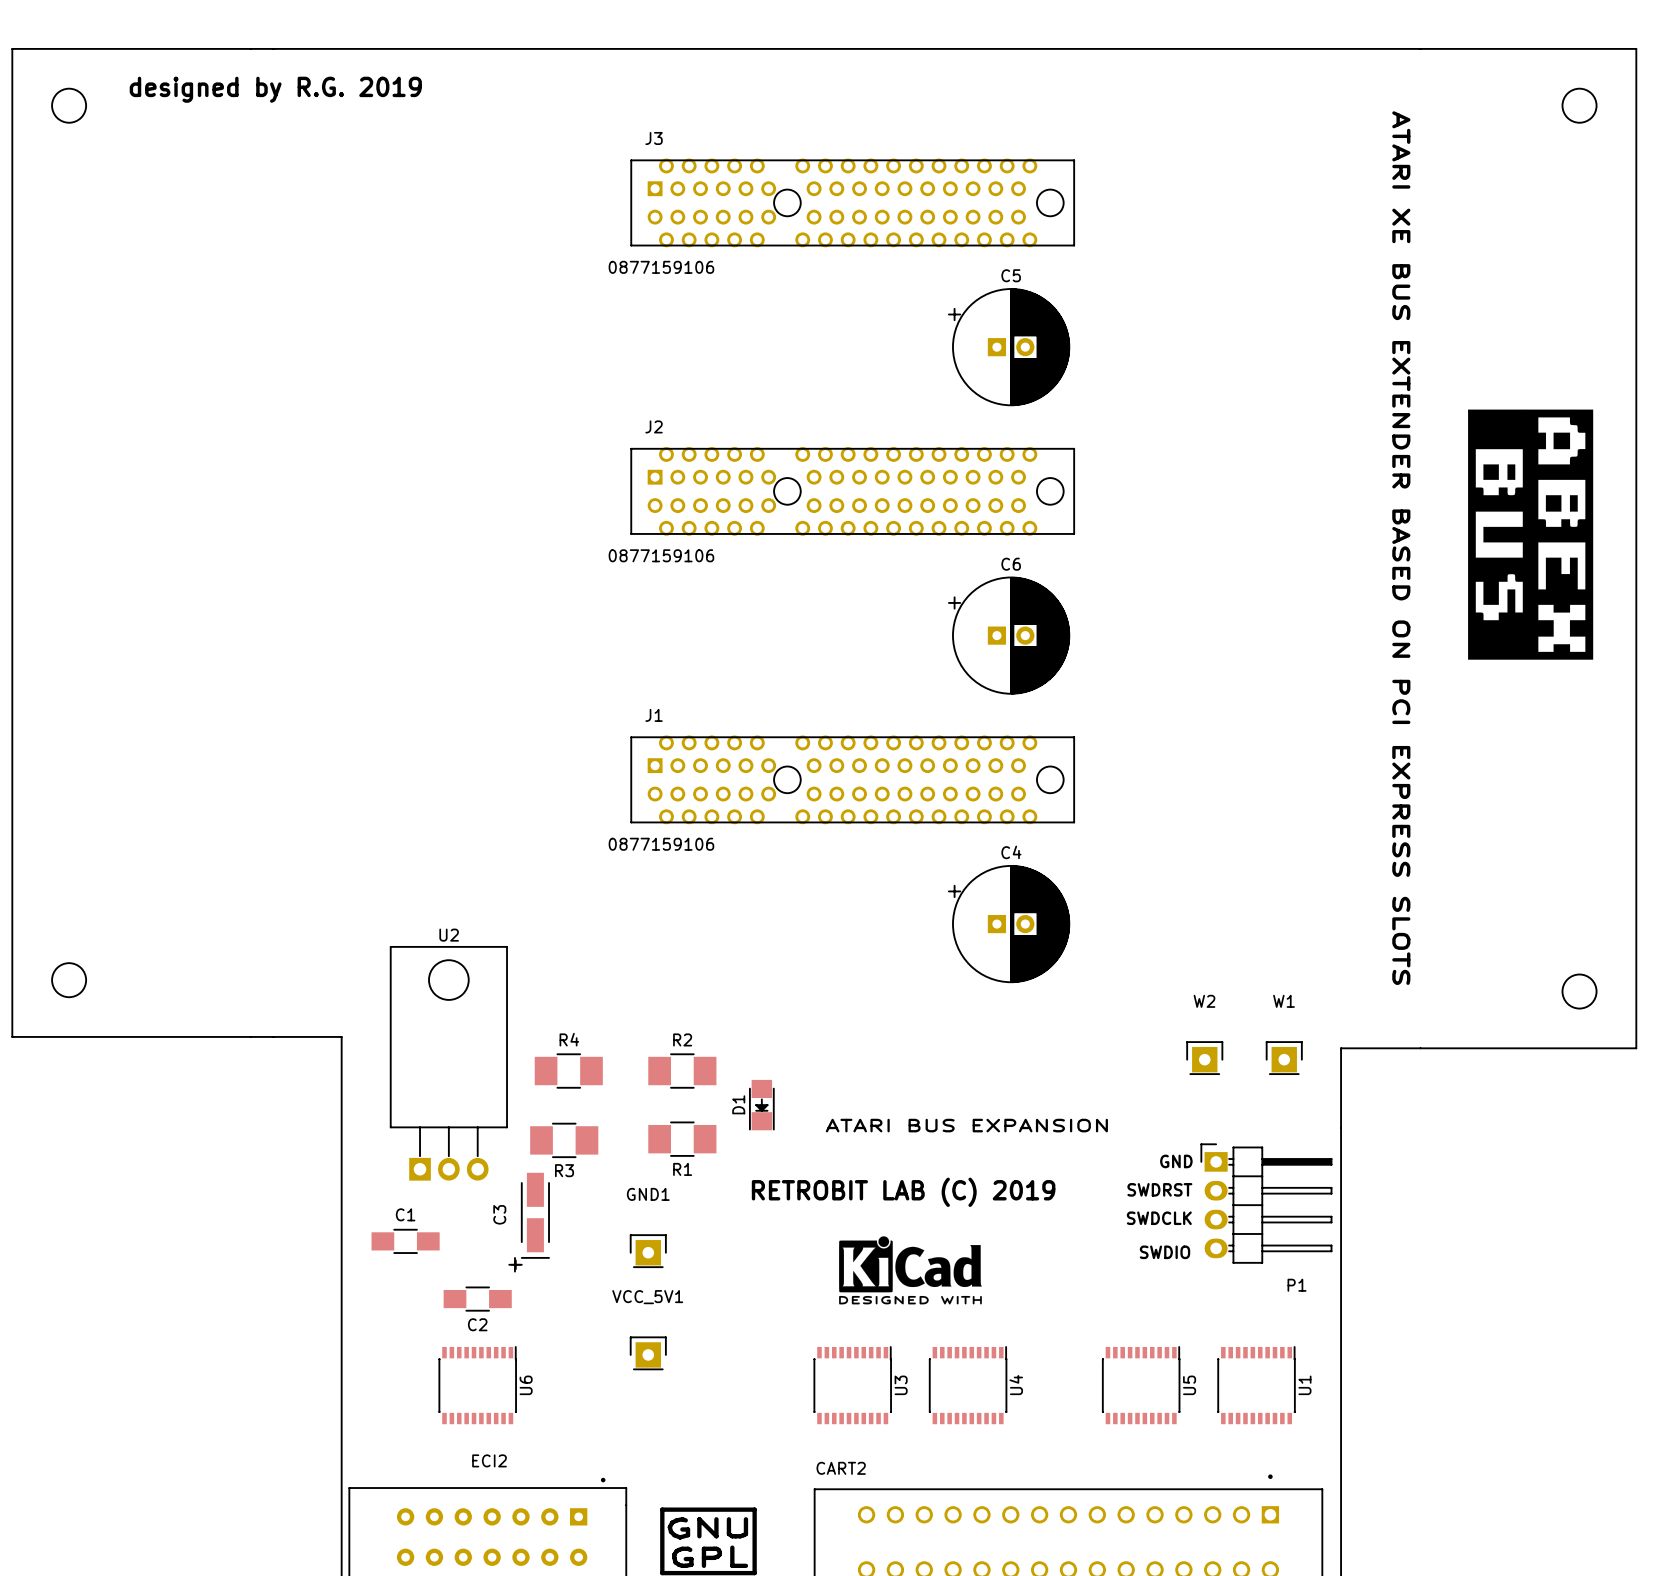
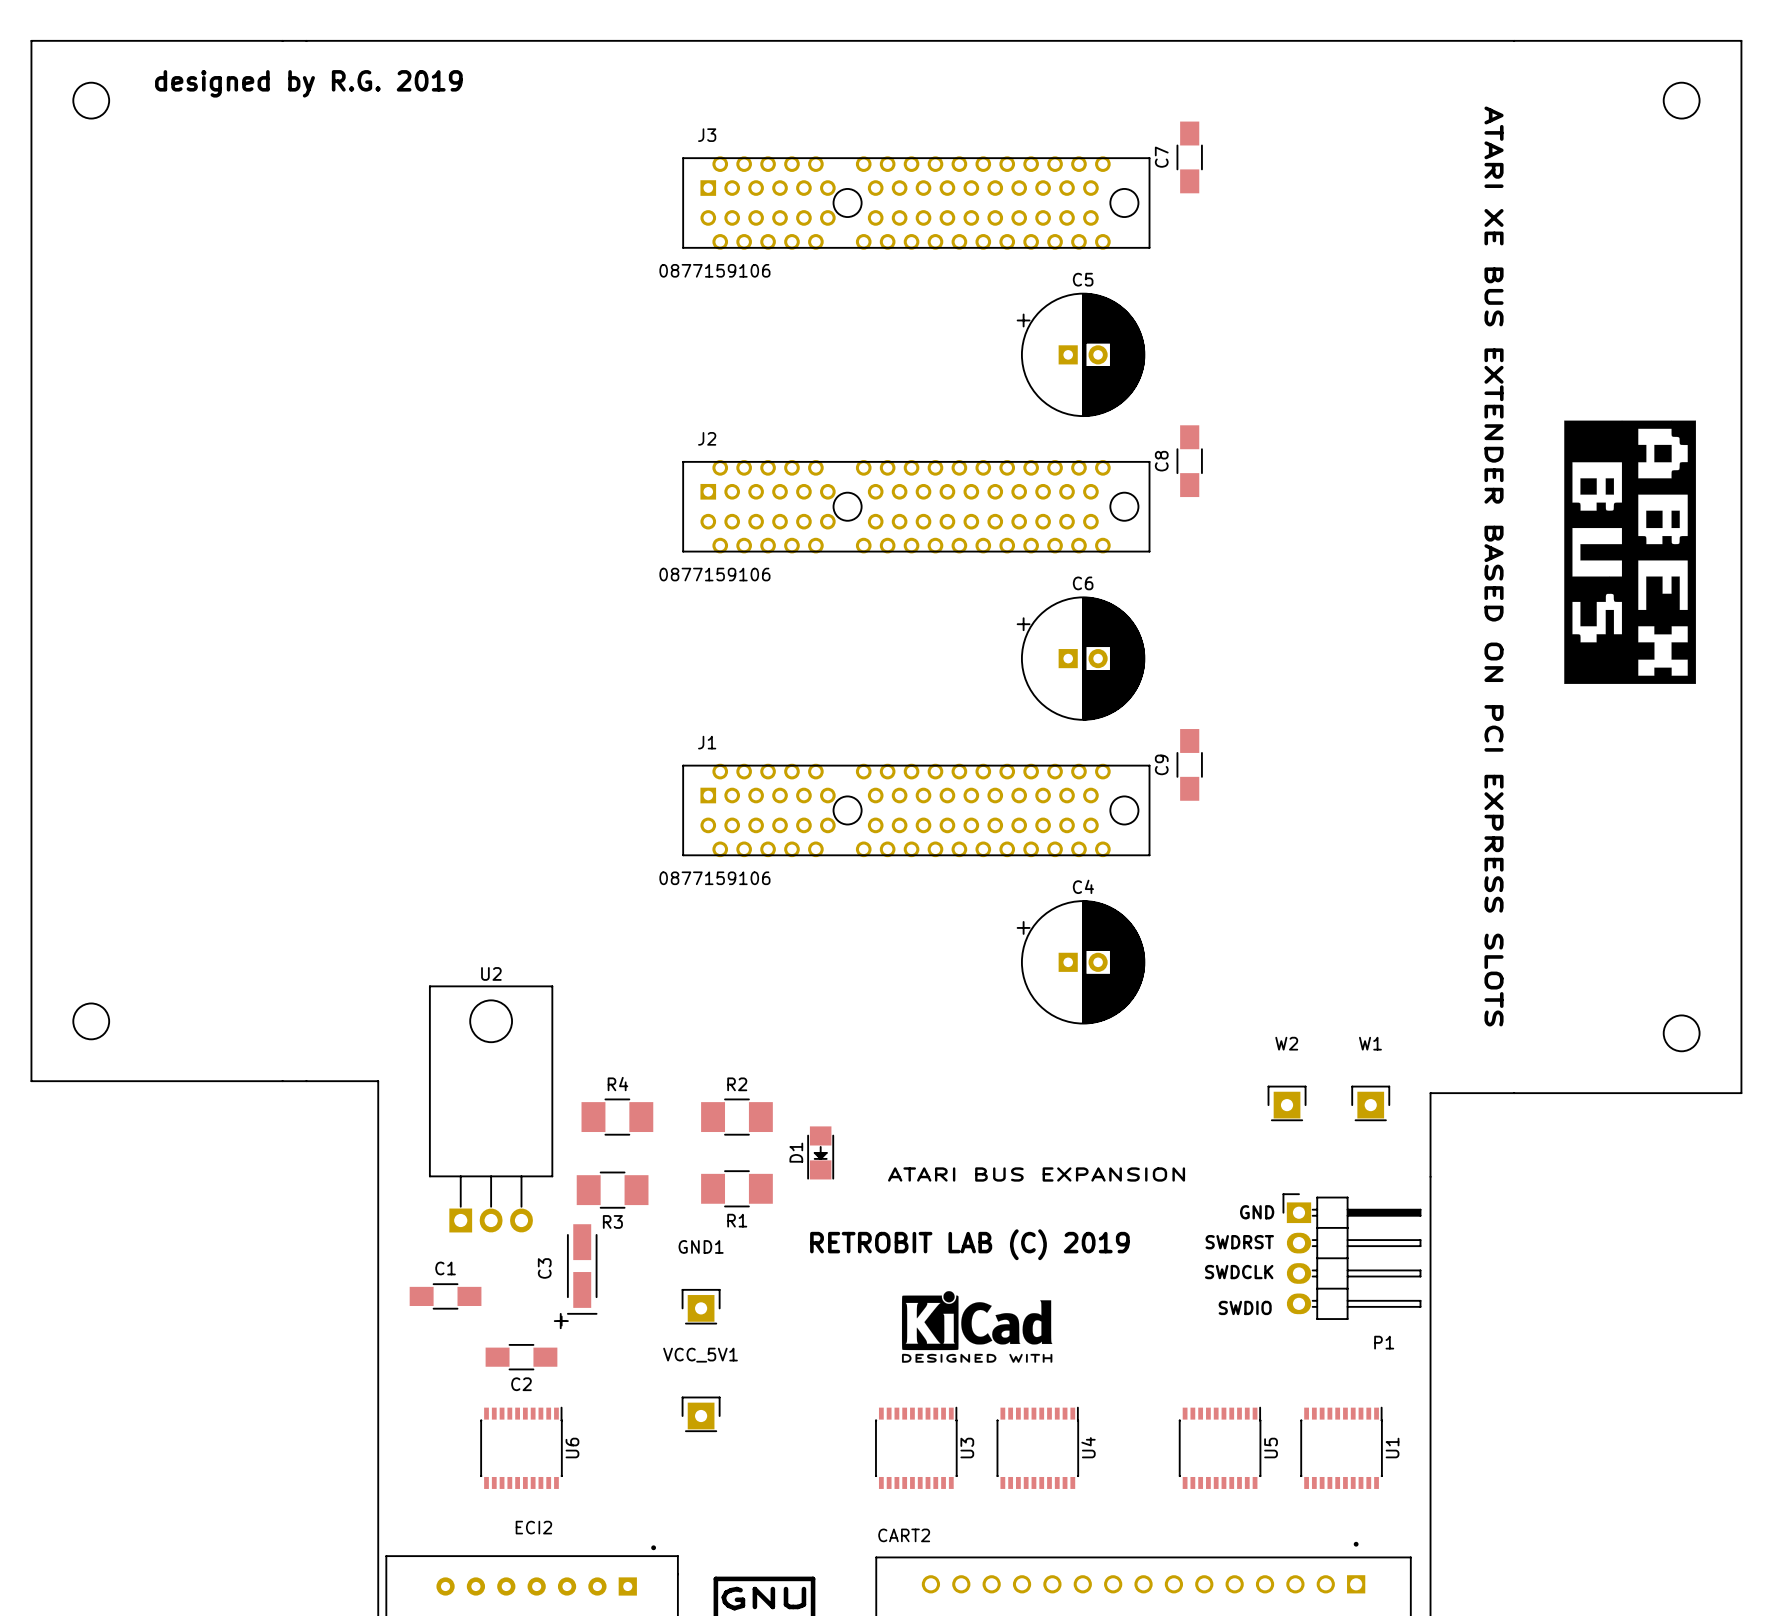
C7: none -> (1189, 157)
C8: none -> (1189, 461)
C9: none -> (1189, 764)

